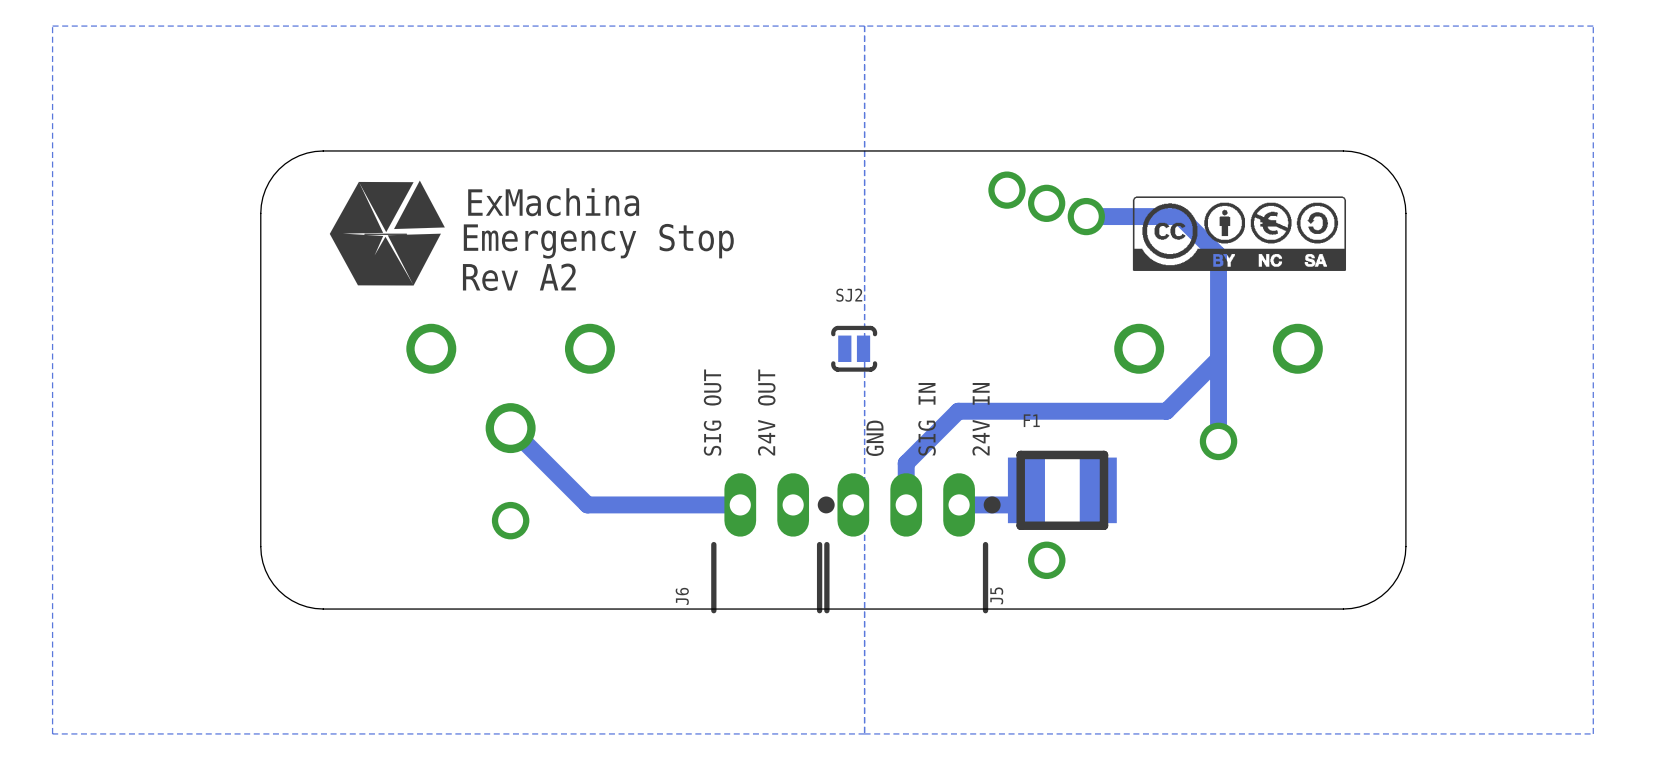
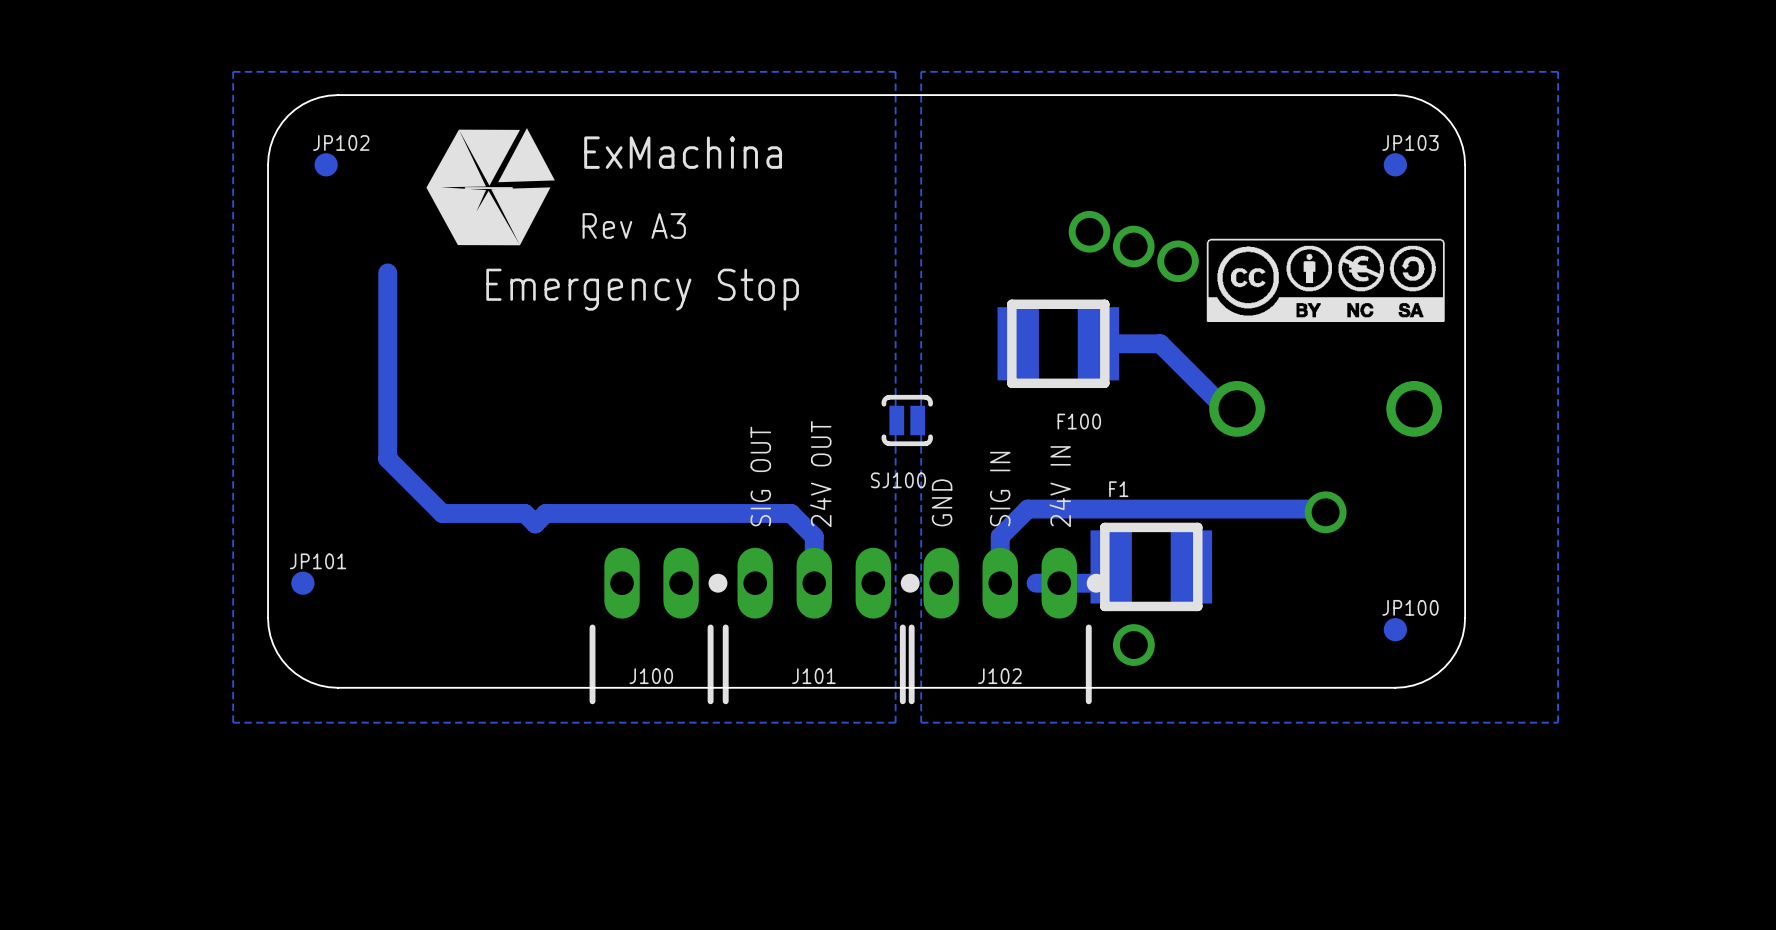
zone outline: (864, 26) (864, 733) -> none
zone outline: (1593, 26) (52, 26) (52, 733) (1593, 733) (1593, 26) -> none
zone outline: none -> (895, 71) (233, 71) (233, 722) (895, 722) (895, 71)
zone outline: none -> (1558, 71) (921, 71) (921, 722) (1558, 722) (1558, 71)
JP102: none -> (326, 164)
JP103: none -> (1395, 164)
board edge: (1343, 150) (323, 150) (299, 155) (285, 163) (273, 175) (265, 189) (261, 205) (260, 546) (265, 570) (273, 584) (285, 596) (307, 606) (323, 609) (1343, 609) (1367, 604) (1381, 596) (1393, 584) (1401, 570) (1405, 554) (1405, 213) (1401, 189) (1387, 169) (1367, 155) (1343, 150) -> (1395, 95) (1422, 100) (1444, 115) (1459, 138) (1465, 164) (1464, 627) (1459, 644) (1450, 660) (1430, 678) (1413, 685) (1395, 687) (337, 687) (319, 685) (302, 678) (288, 667) (277, 652) (270, 636) (268, 618) (268, 164) (270, 146) (277, 129) (288, 115) (302, 104) (319, 97) (337, 95) (1395, 95)
text: none -> Rev A3 (634, 225)
track: (1086, 216) (1180, 216) (1218, 255) (1218, 441) -> none
track: none -> (387, 272) (387, 458) (442, 513) (524, 513) (535, 523) (545, 513) (791, 513) (814, 536) (814, 583)
drawing position: (387, 233) -> (490, 186)
drawing position: (1239, 233) -> (1325, 280)
text: Rev A2 (519, 277) -> none
F100: none -> (1058, 343)
track: none -> (1098, 343) (1160, 343) (1237, 420)
SJ2 name: SJ2 (849, 295) -> SJ100 (898, 480)
SJ2 position: (854, 348) -> (907, 420)
track: (1218, 359) (1166, 411) (958, 411) (906, 463) (906, 504) -> none
track: (510, 428) (587, 504) (740, 504) -> none
part: (510, 431) -> none
track: none -> (1325, 509) (1027, 509) (1000, 536) (1000, 583)
JP101: none -> (302, 583)
J100: none -> (658, 626)
J101: none -> (821, 626)
J6: (772, 543) -> none
J5 position: (912, 543) -> (1007, 626)
JP100: none -> (1395, 629)
J5 name: J5 (996, 595) -> J102 (999, 676)

